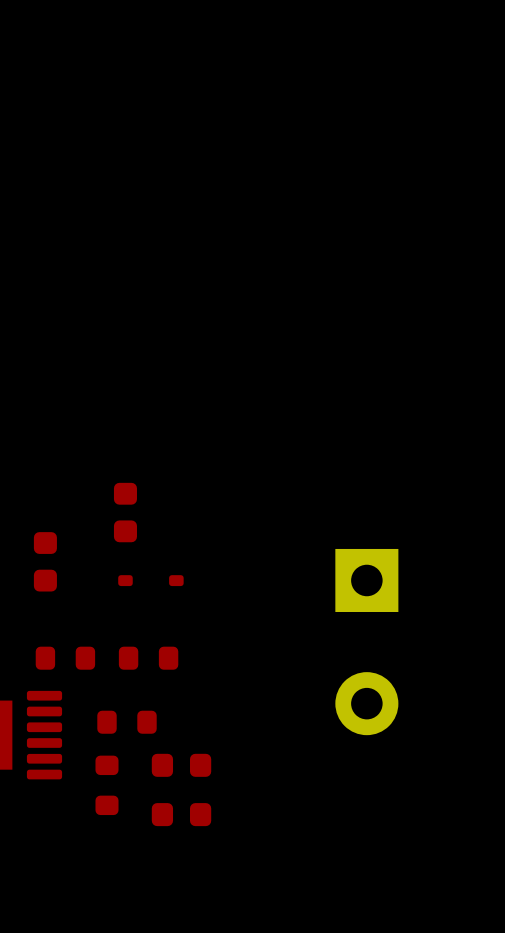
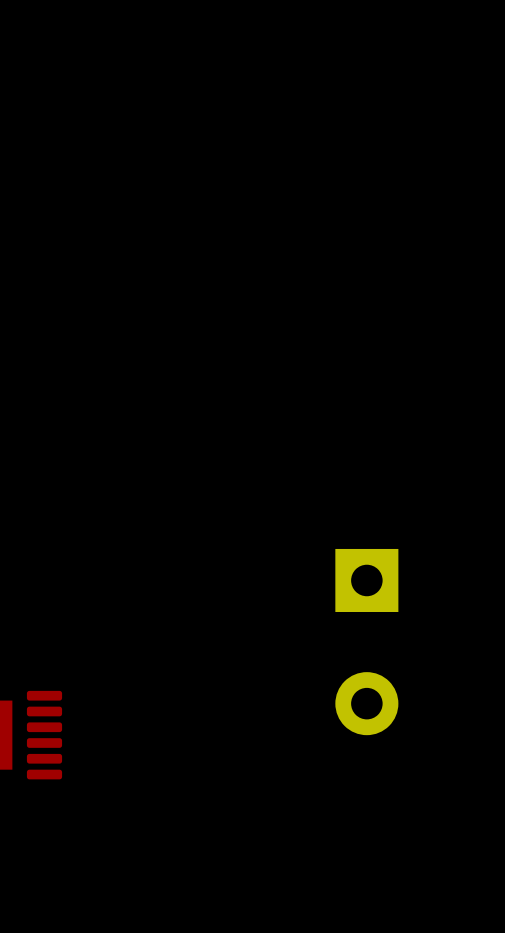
part: (125, 512) -> none
part: (45, 561) -> none
part: (150, 580) -> none
part: (65, 658) -> none
part: (148, 658) -> none
part: (127, 722) -> none
part: (181, 765) -> none
part: (107, 785) -> none
part: (181, 814) -> none

